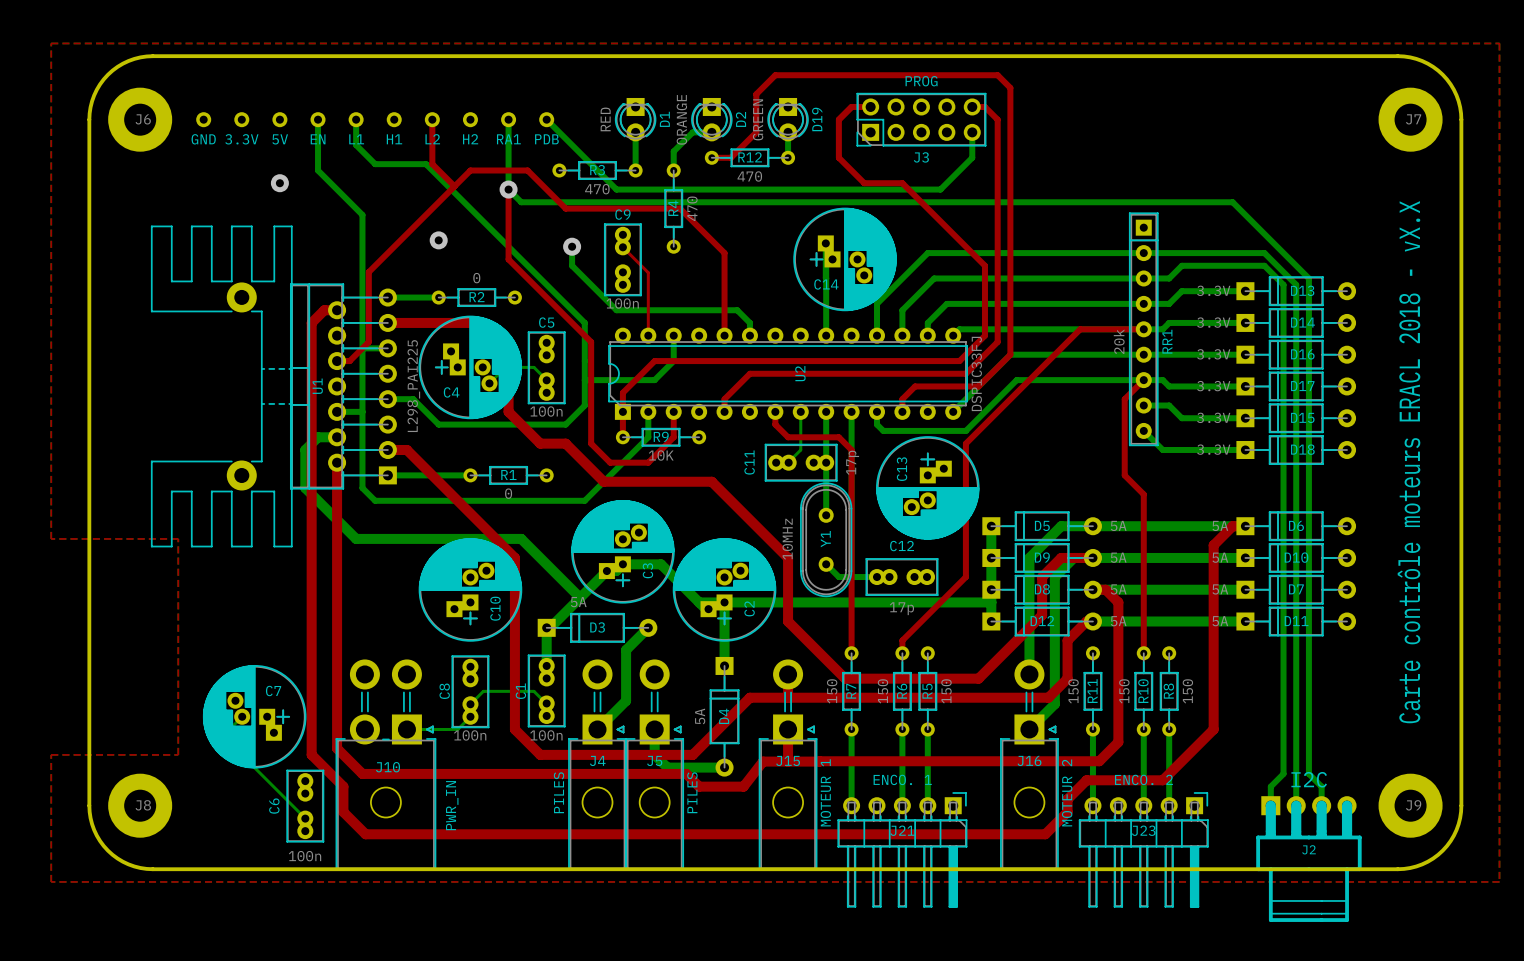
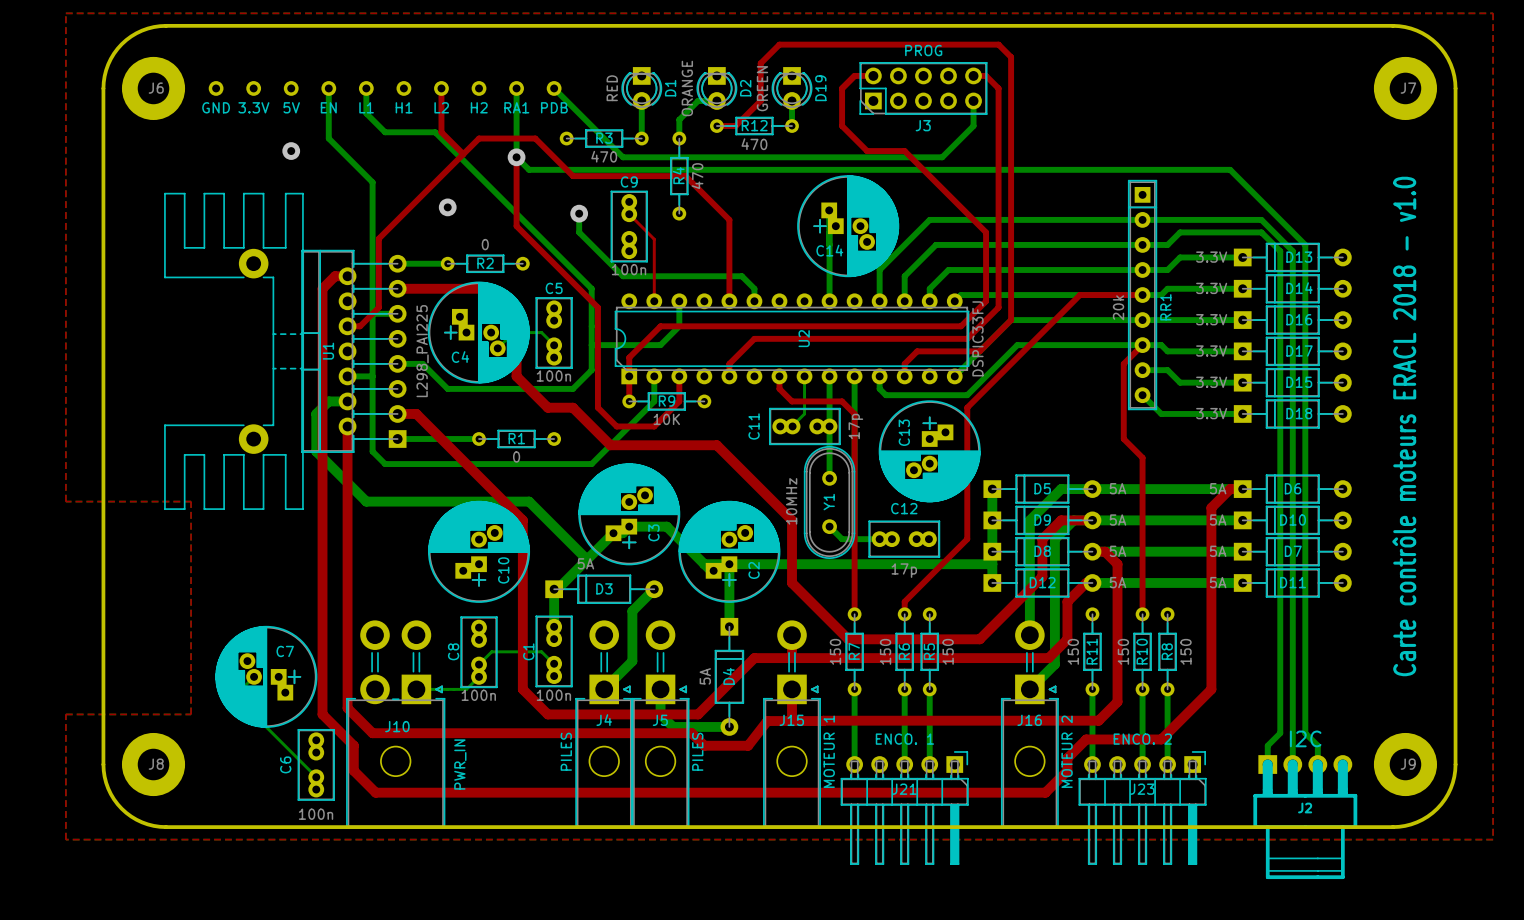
text: Carte contrôle moteurs ERACL 2018 - vX.X (1409, 462) -> Carte contrôle moteurs ERACL 2018 - v1.0 (1404, 426)

